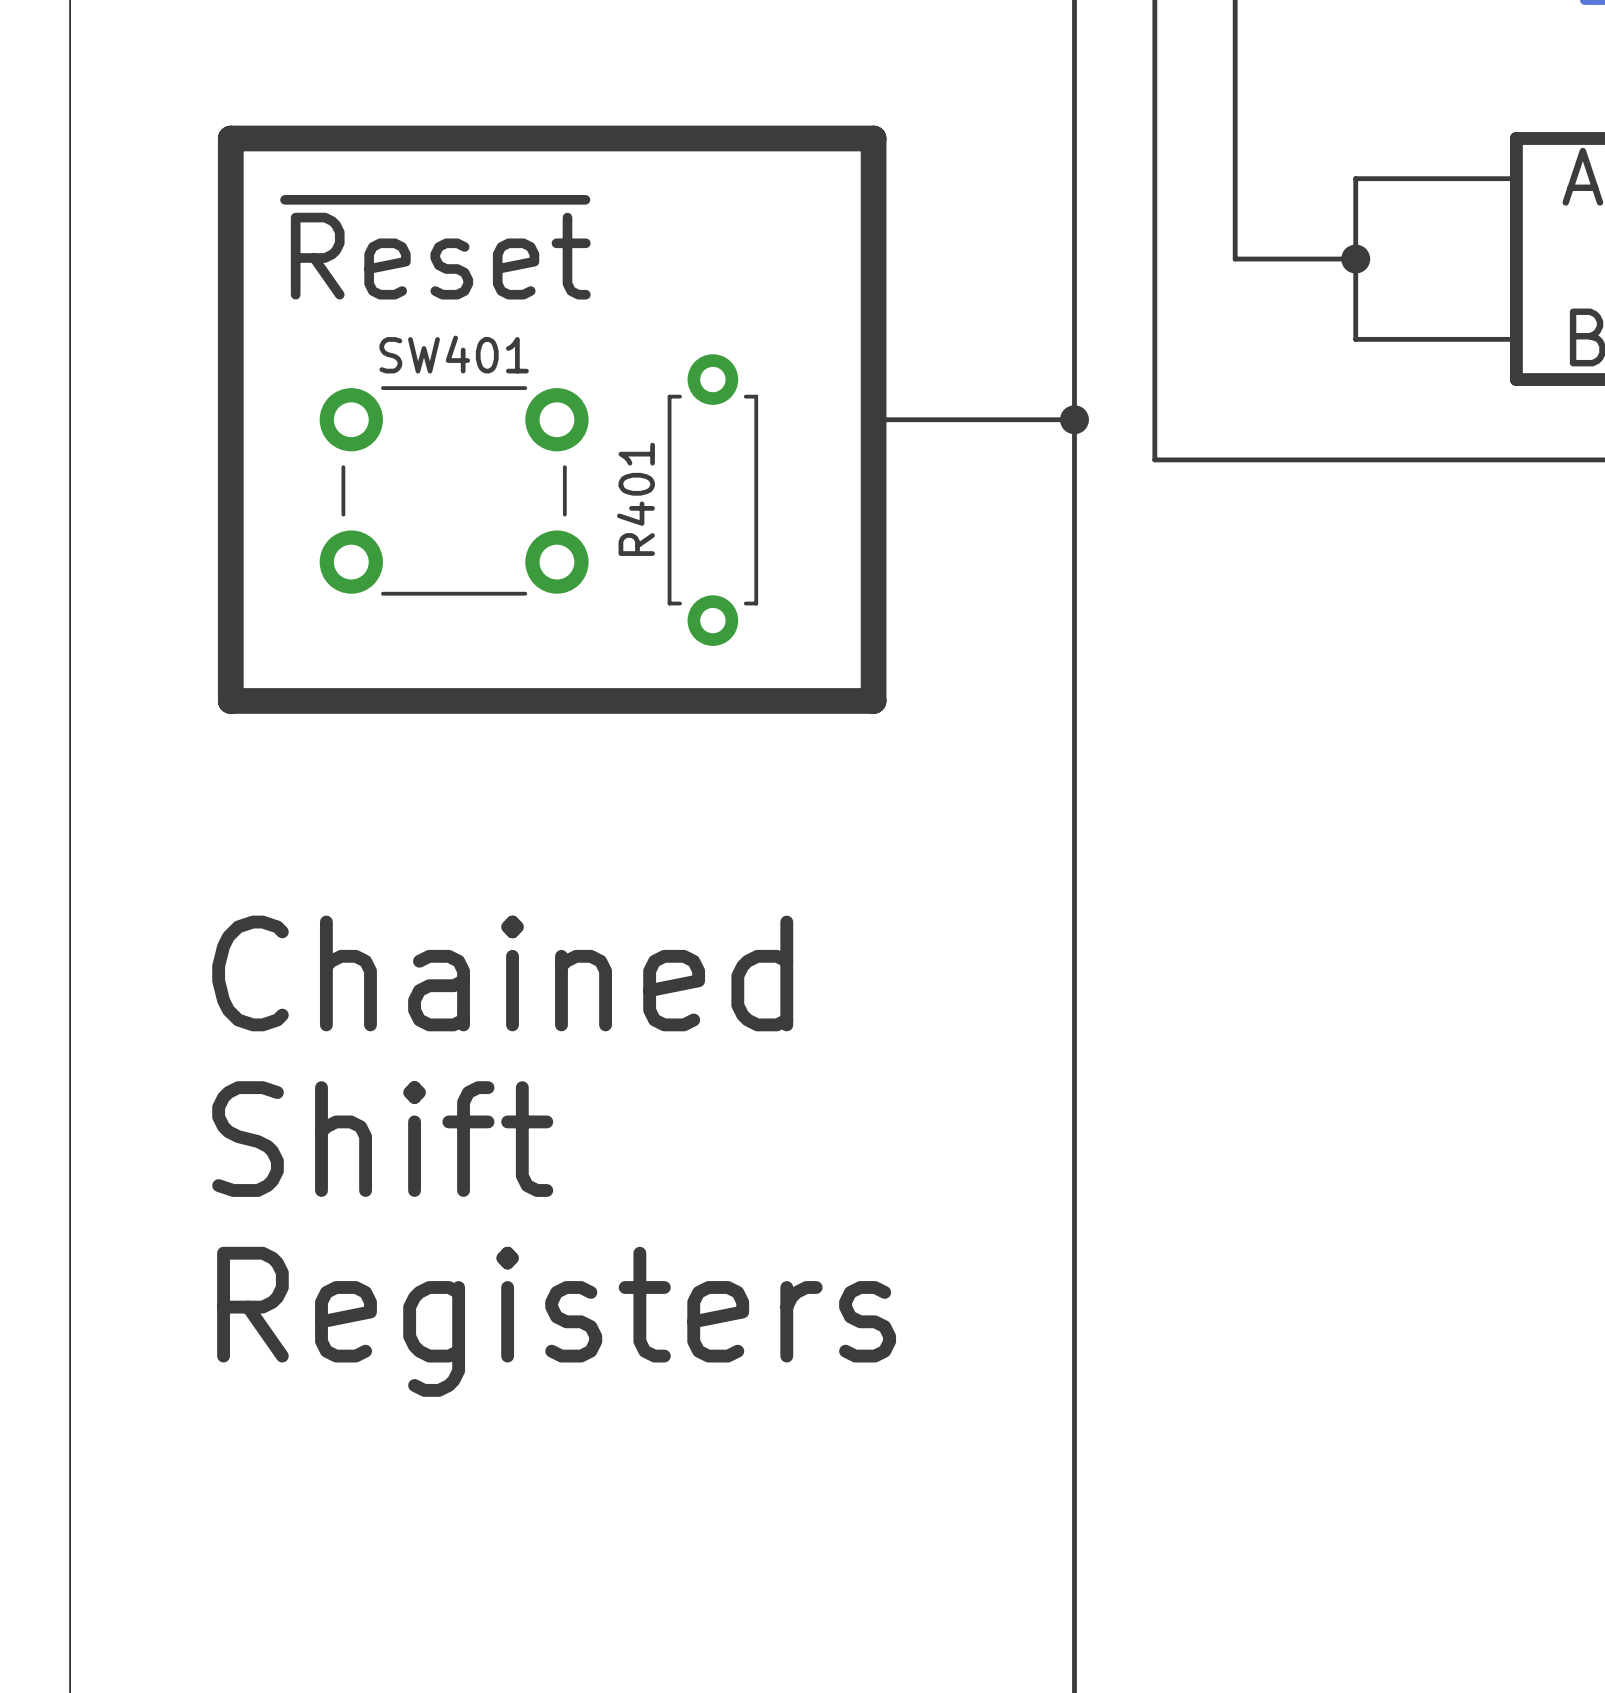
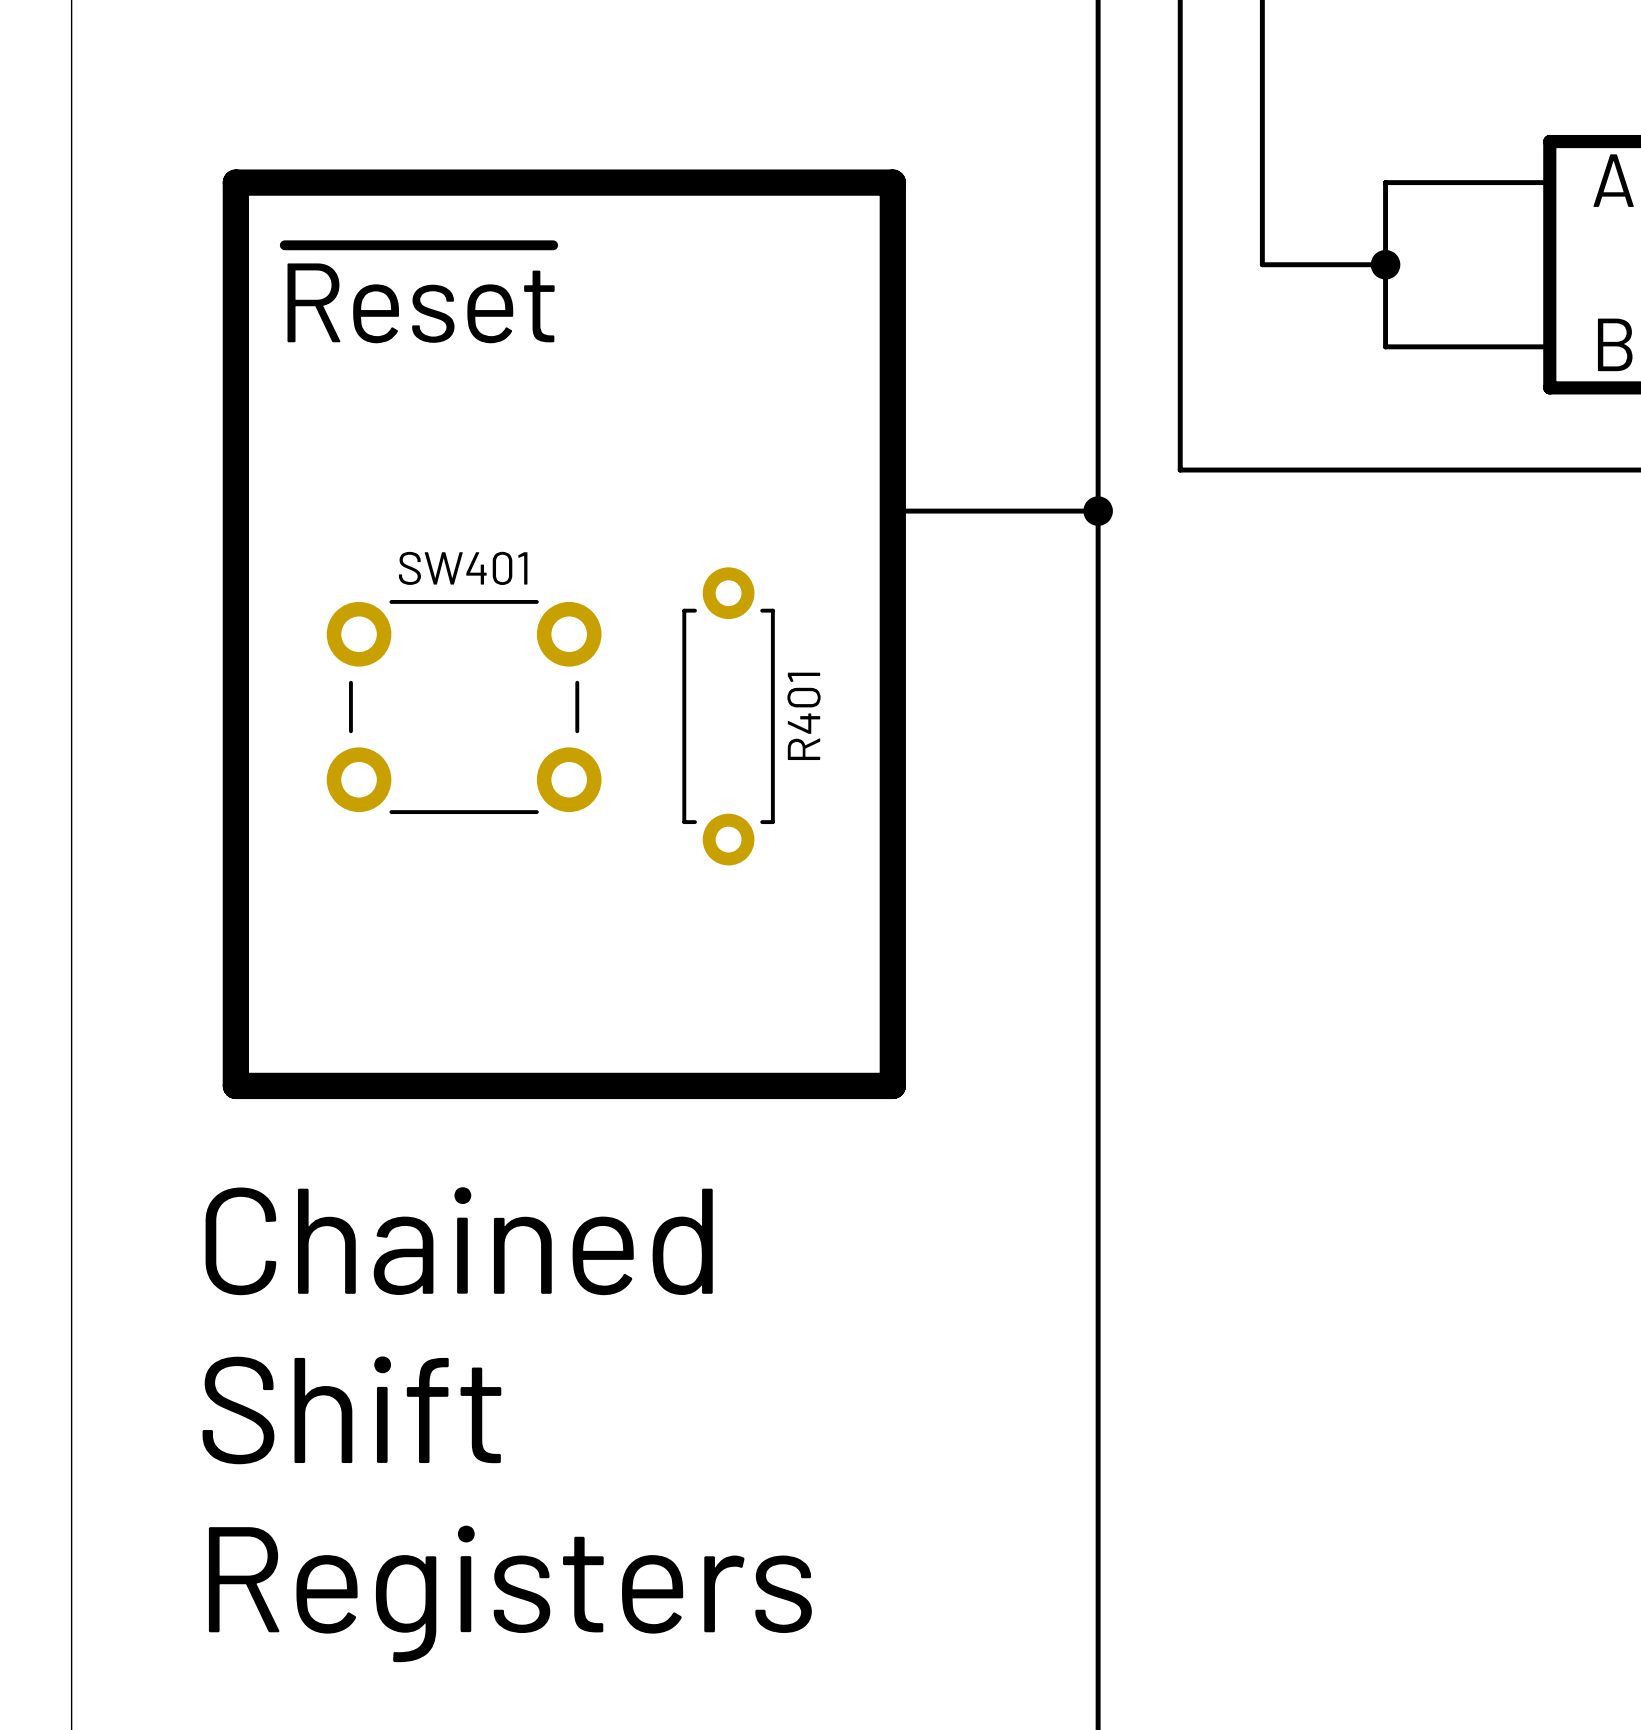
line: (230, 178) (230, 138) (873, 138) (873, 178) -> (235, 182) (892, 182)
text position: ~{Reset} (435, 247) -> ~{Reset} (419, 294)
line: (873, 419) (1074, 419) -> none
drawing position: (1074, 419) -> (1098, 511)
SW401 position: (454, 490) -> (464, 707)
R401 name position: R401 (635, 499) -> R401 (804, 716)
R401 position: (712, 500) -> (728, 716)
line: none -> (892, 511) (1089, 511)
line: (230, 700) (873, 700) -> (235, 716) (235, 1085) (892, 1085) (892, 716)
text position: Chained (502, 973) -> Chained (459, 1241)
text position: Shift (382, 1139) -> Shift (351, 1410)
text position: Registers (556, 1321) -> Registers (510, 1593)

